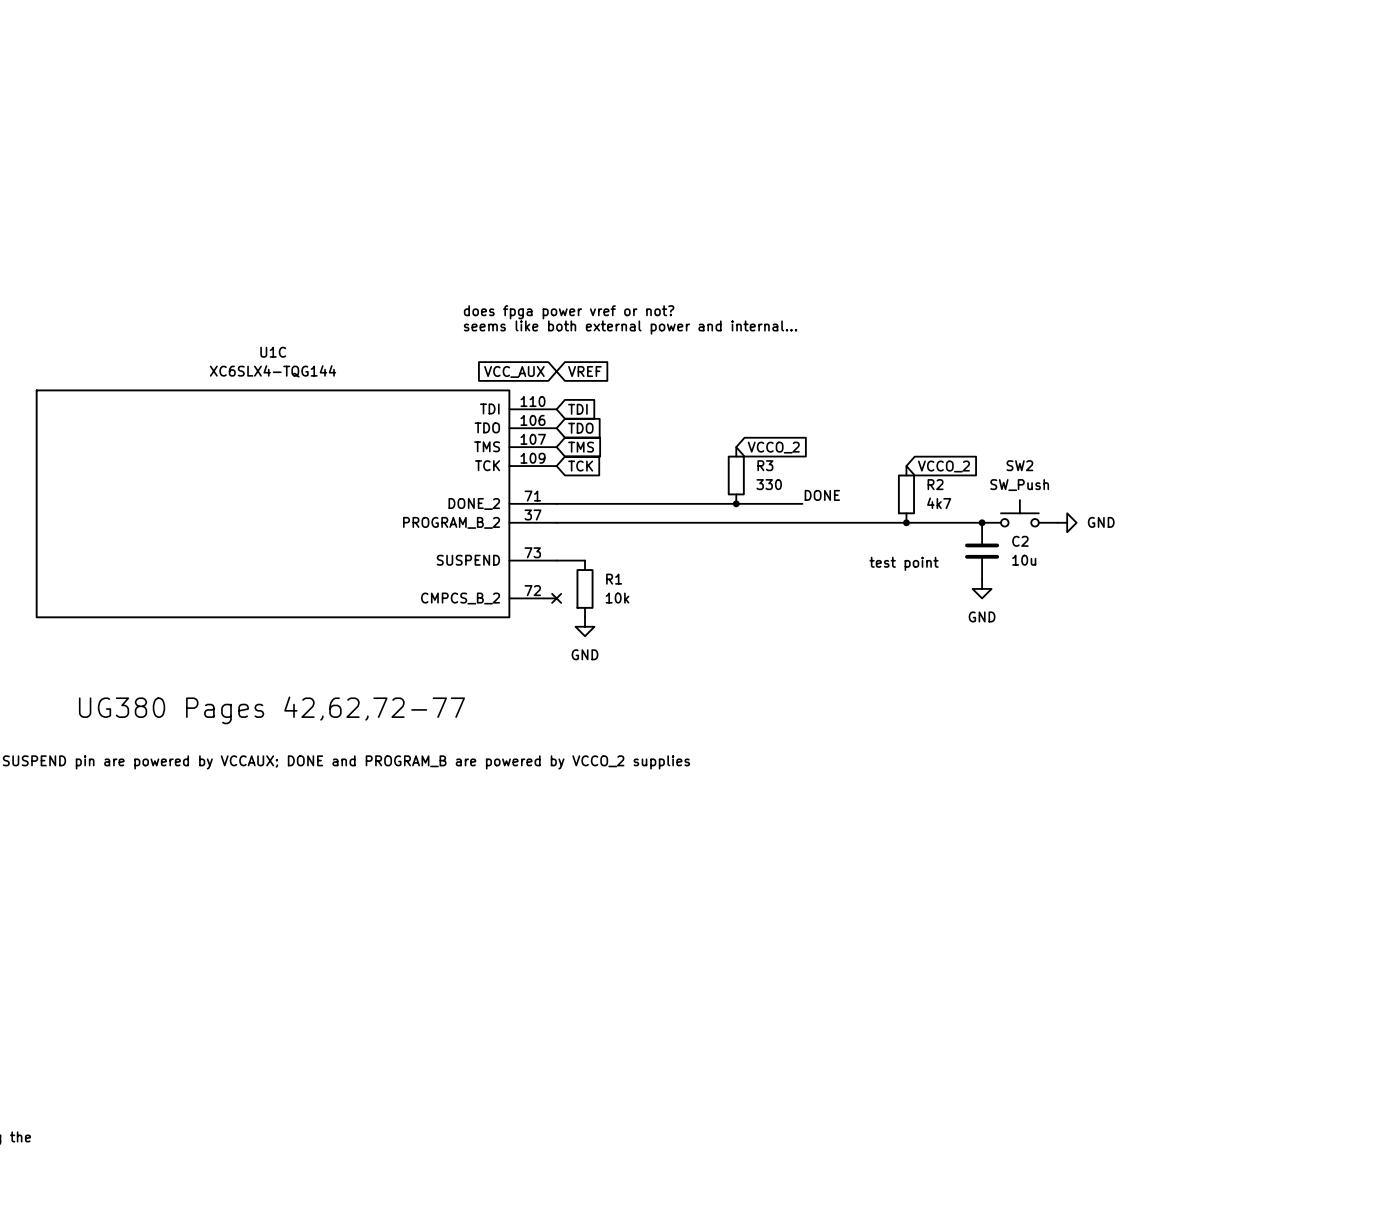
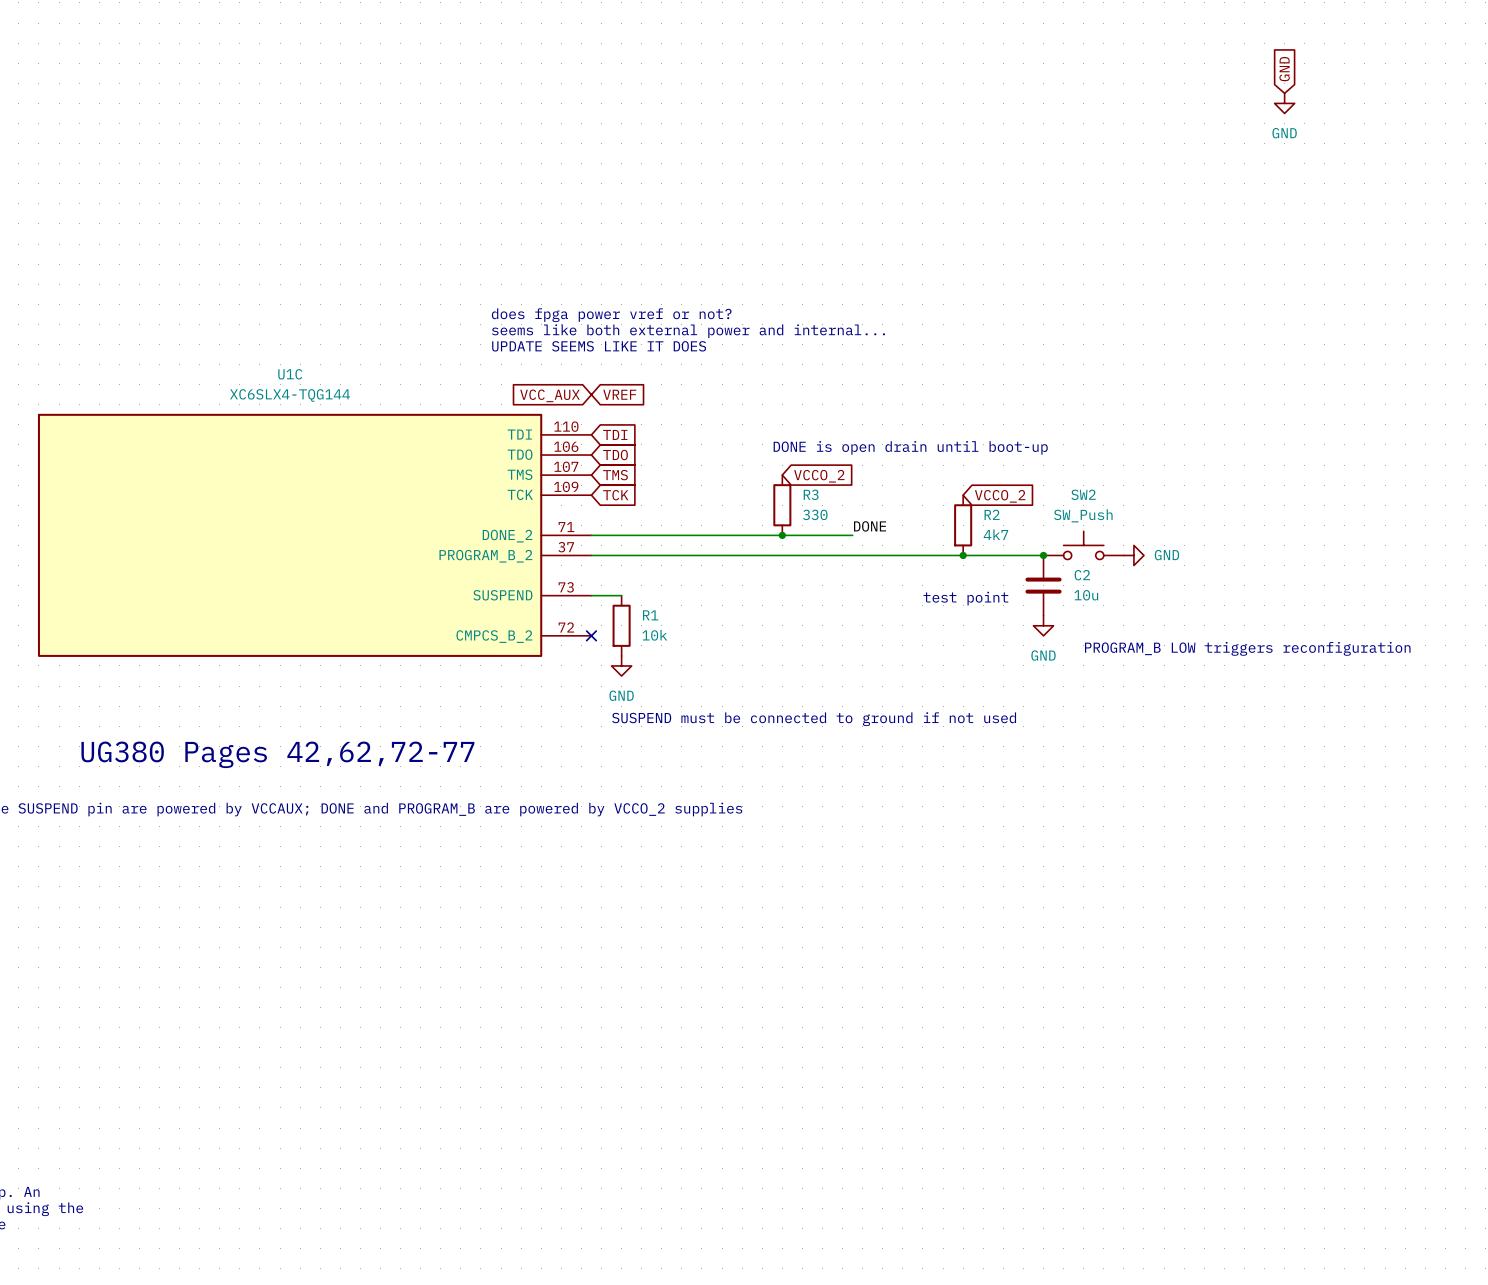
global label: none -> GND (1284, 69)
power symbol: none -> GND (1284, 103)
text: none -> does fpga power vref or not? (611, 315)
text: does fpga power vref or not? (569, 312) -> seems like both external power and internal... (688, 331)
text: seems like both external power and internal... (630, 327) -> UPDATE SEEMS LIKE IT DOES (599, 346)
text: none -> DONE is open drain until boot-up (910, 447)
text: none -> PROGRAM_B LOW triggers reconfiguration (1247, 648)
text: none -> SUSPEND must be connected to ground if not used (814, 719)

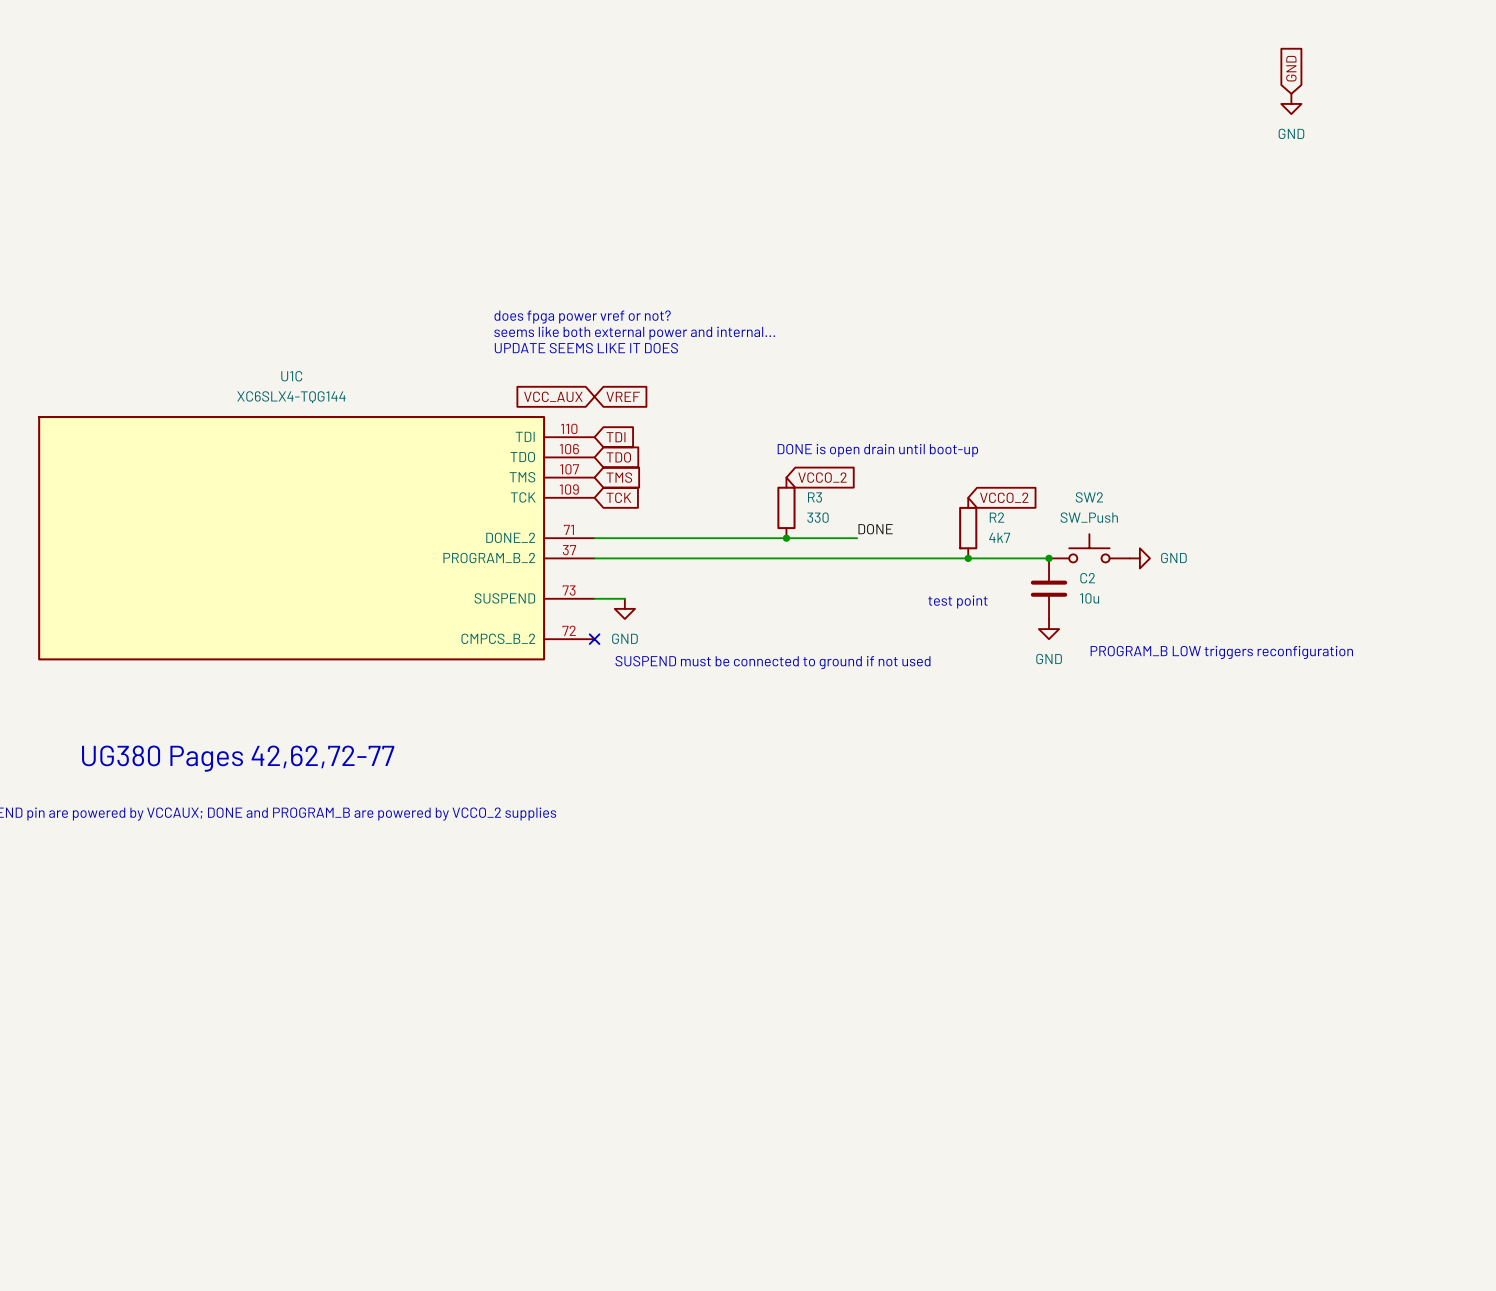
R1: 10k (621, 625) -> none
power symbol position: GND (621, 665) -> GND (624, 608)
text position: SUSPEND must be connected to ground if not used (814, 719) -> SUSPEND must be connected to ground if not used (772, 662)

